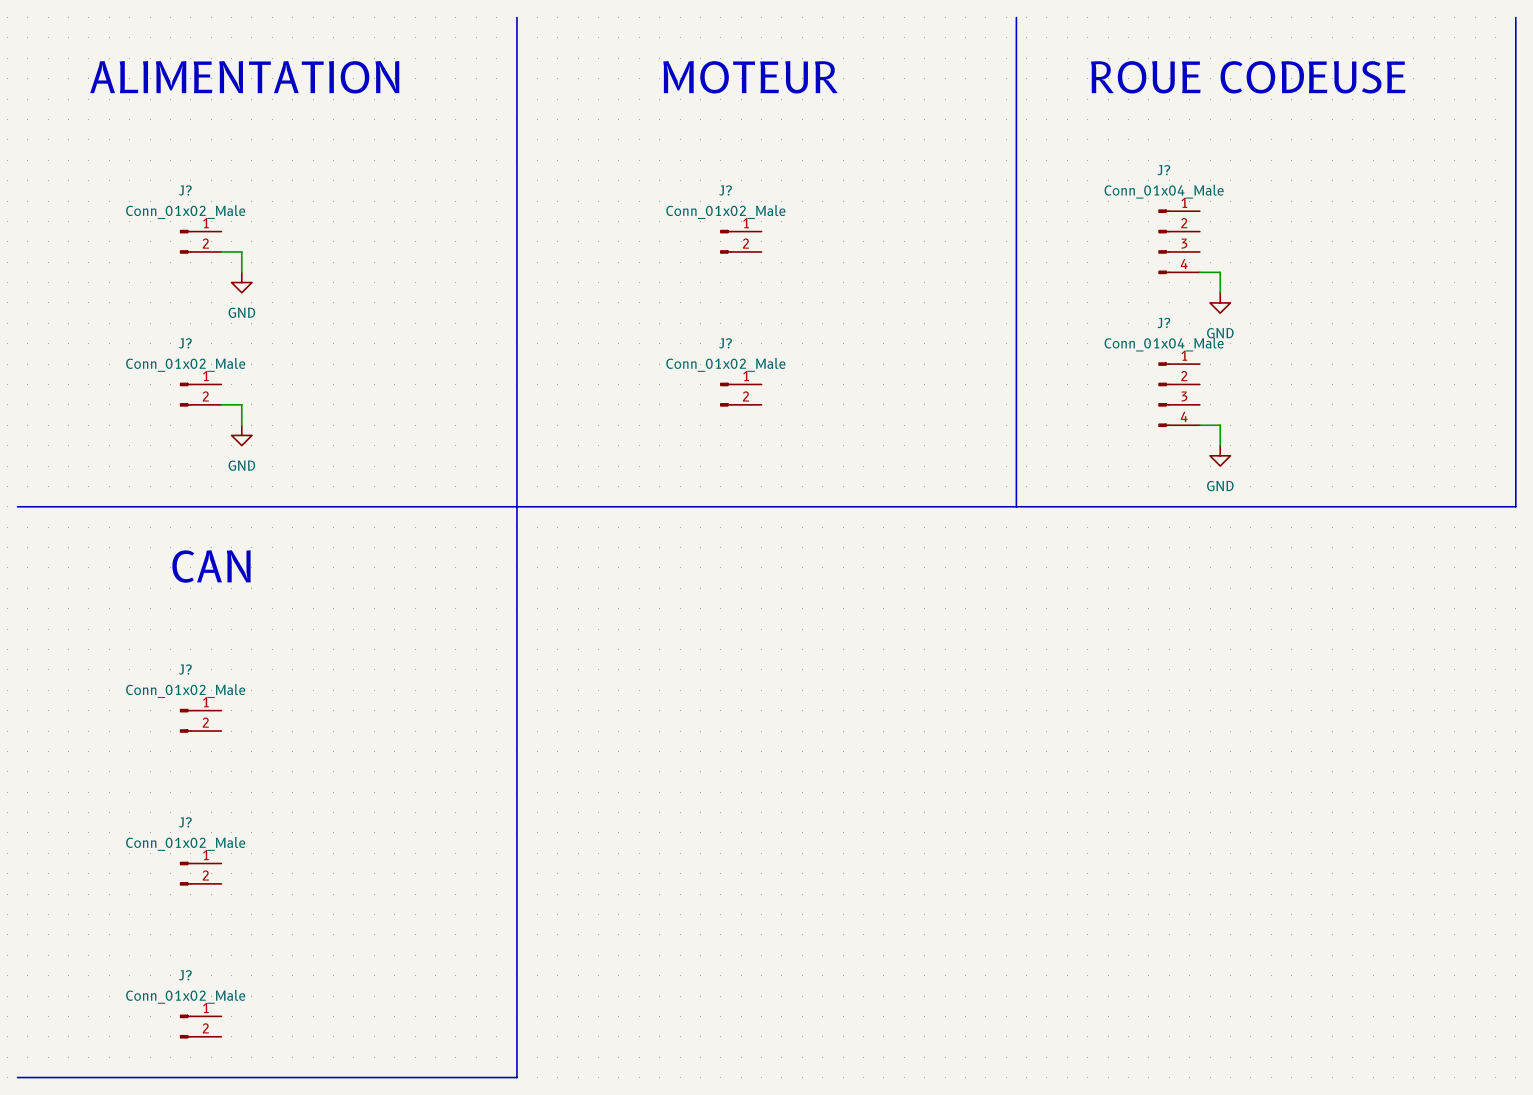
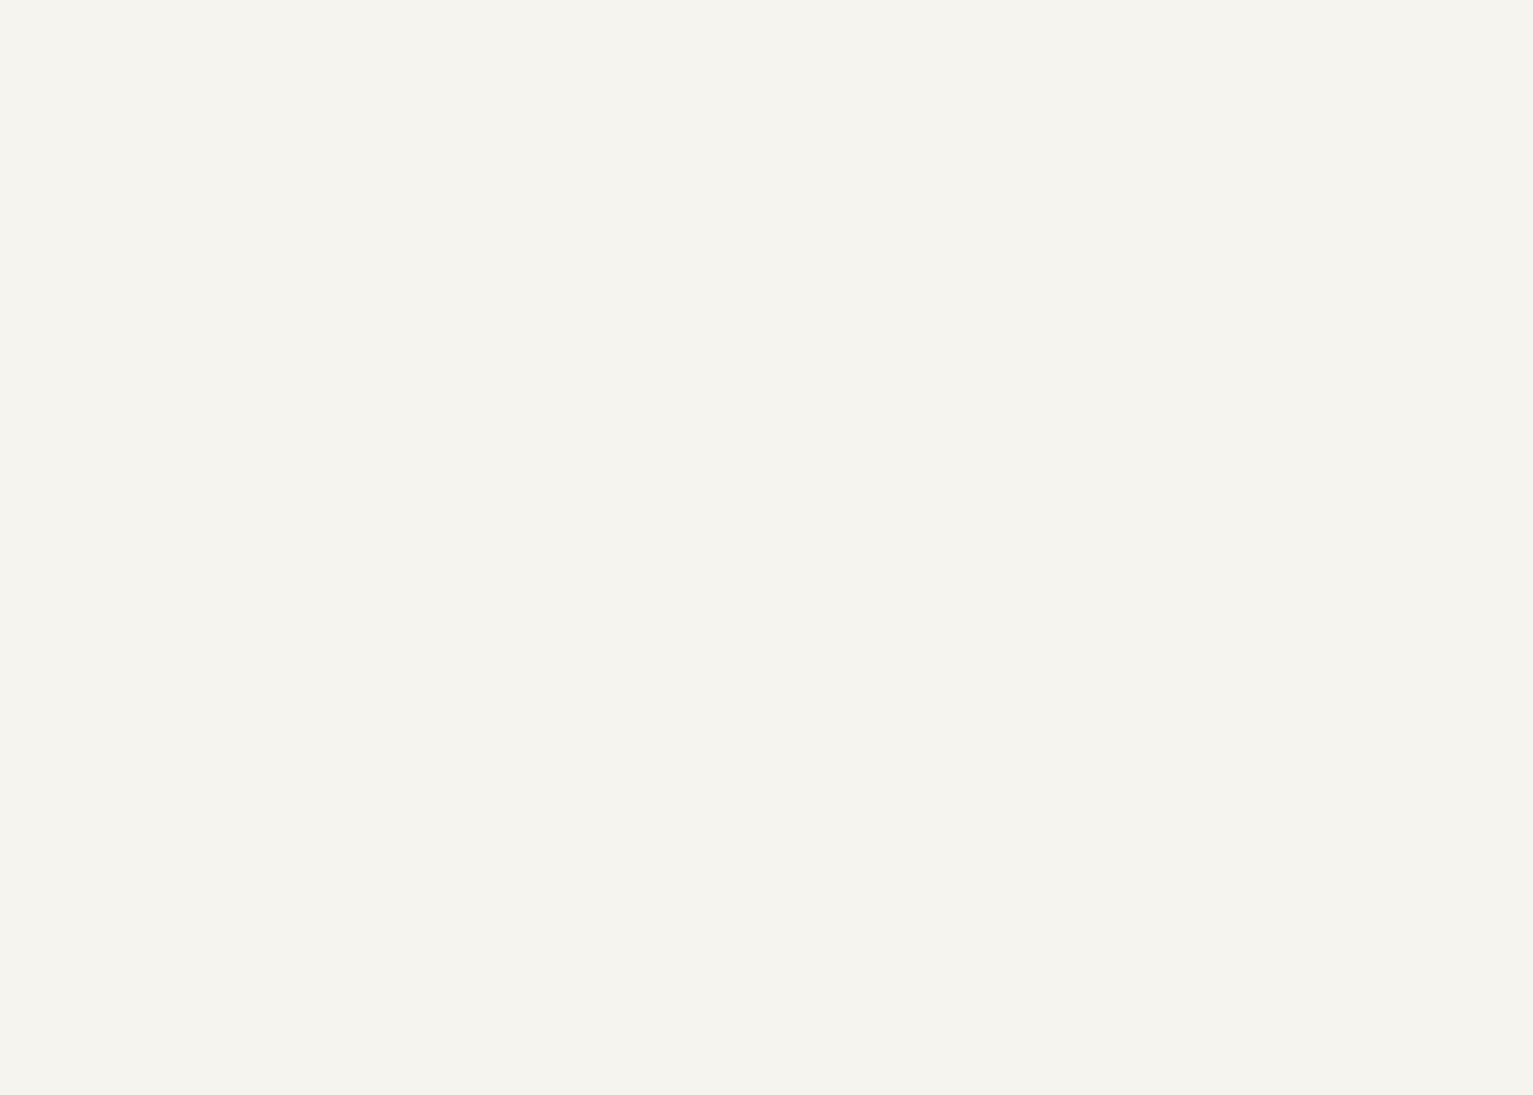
line: (516, 17) (516, 1077) (17, 1077) -> none
line: (1016, 17) (1016, 506) -> none
line: (1515, 17) (1515, 506) (17, 506) -> none
text: ALIMENTATION (244, 77) -> none
text: MOTEUR (750, 77) -> none
text: ROUE CODEUSE (1248, 77) -> none
J?: Conn_01x02_Male (200, 241) -> none
J?: Conn_01x02_Male (740, 241) -> none
J?: Conn_01x04_Male (1179, 241) -> none
wire: (221, 251) (241, 251) (241, 272) -> none
wire: (1199, 272) (1220, 272) (1220, 292) -> none
power symbol: GND (241, 282) -> none
power symbol: GND (1220, 302) -> none
J?: Conn_01x02_Male (200, 394) -> none
J?: Conn_01x02_Male (740, 394) -> none
J?: Conn_01x04_Male (1179, 394) -> none
wire: (221, 404) (241, 404) (241, 425) -> none
wire: (1199, 425) (1220, 425) (1220, 445) -> none
power symbol: GND (241, 435) -> none
power symbol: GND (1220, 455) -> none
text: CAN (211, 566) -> none
J?: Conn_01x02_Male (200, 720) -> none
J?: Conn_01x02_Male (200, 873) -> none
J?: Conn_01x02_Male (200, 1026) -> none

